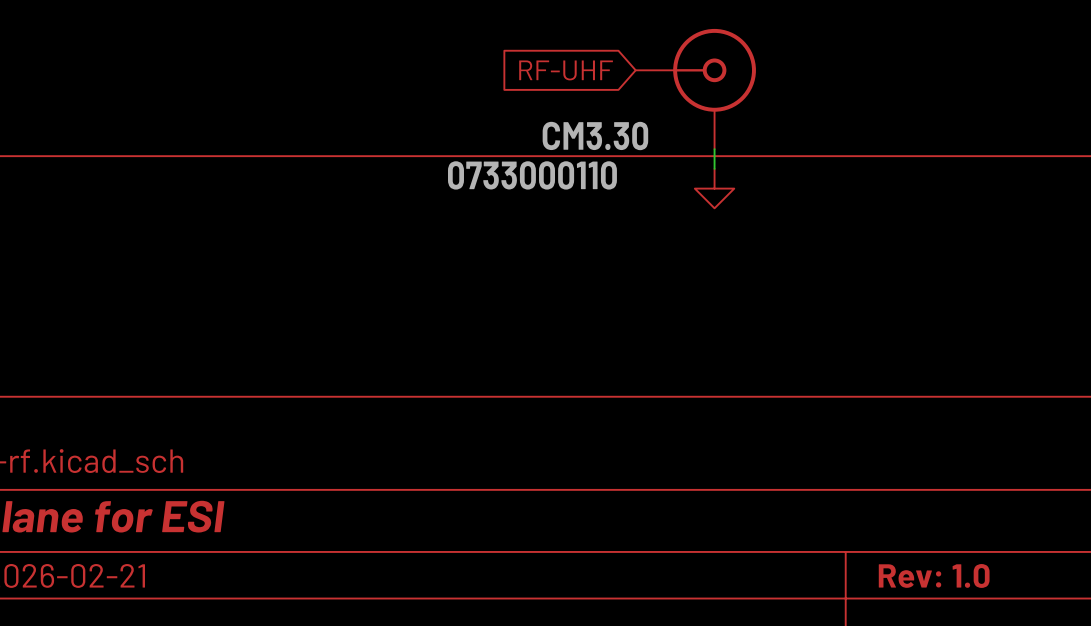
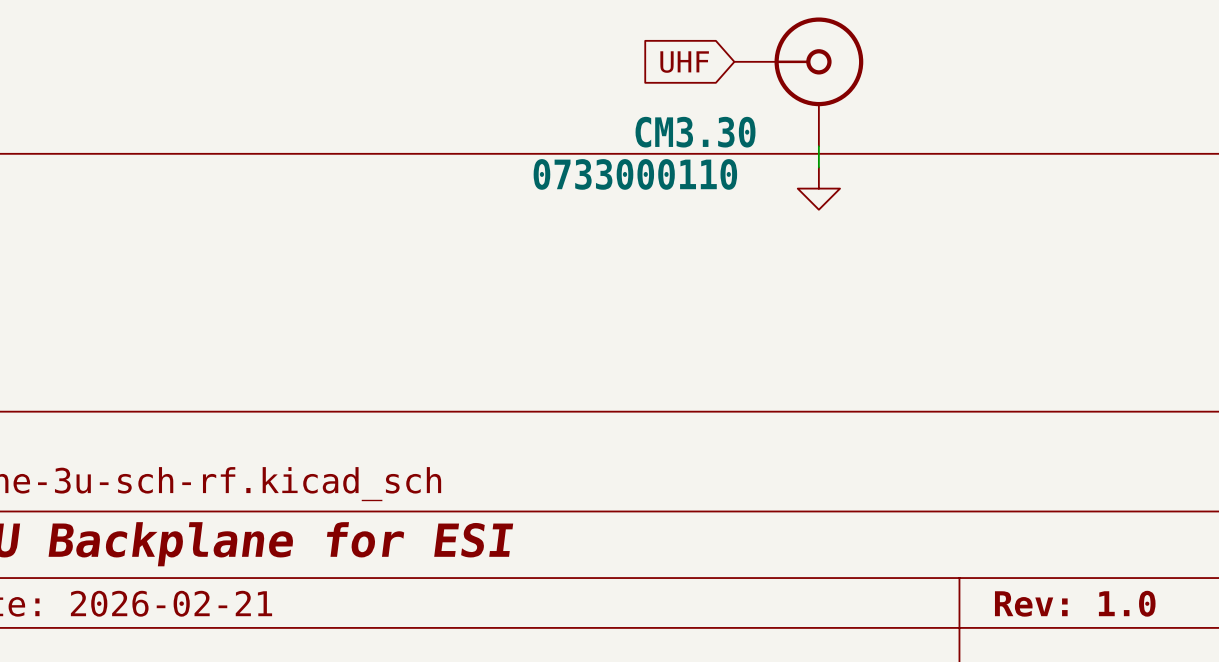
global label: RF-UHF (566, 70) -> UHF (684, 62)

